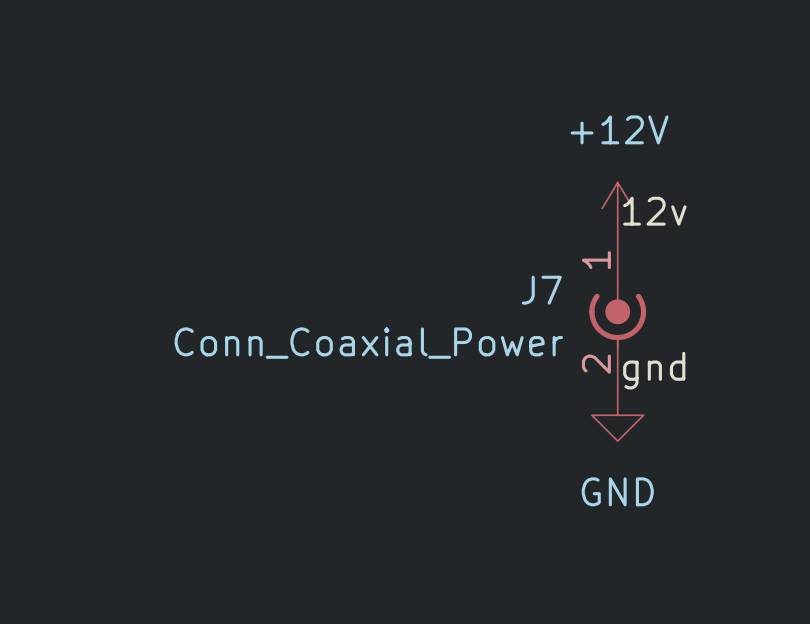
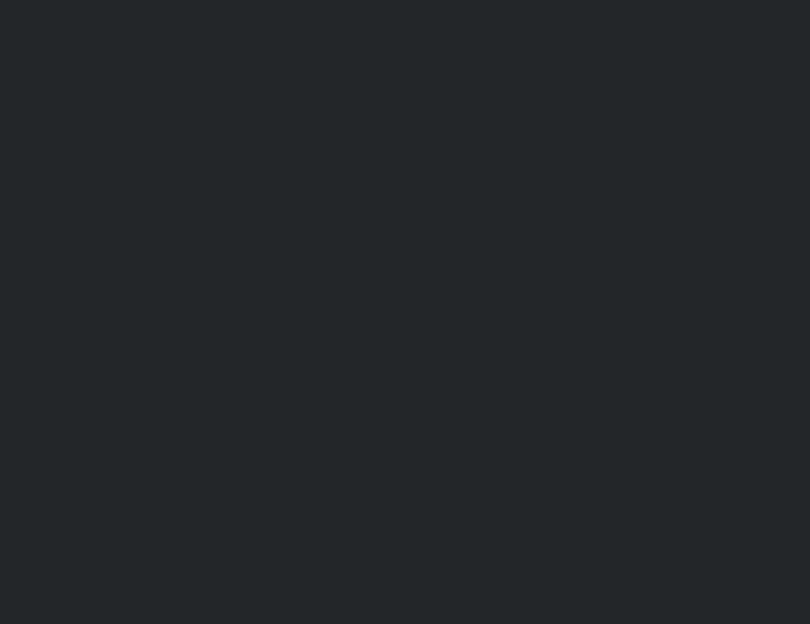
power symbol: +12V (617, 208) -> none
label: 12v (654, 211) -> none
J7: Conn_Coaxial_Power (617, 311) -> none
label: gnd (654, 370) -> none
power symbol: GND (617, 415) -> none

